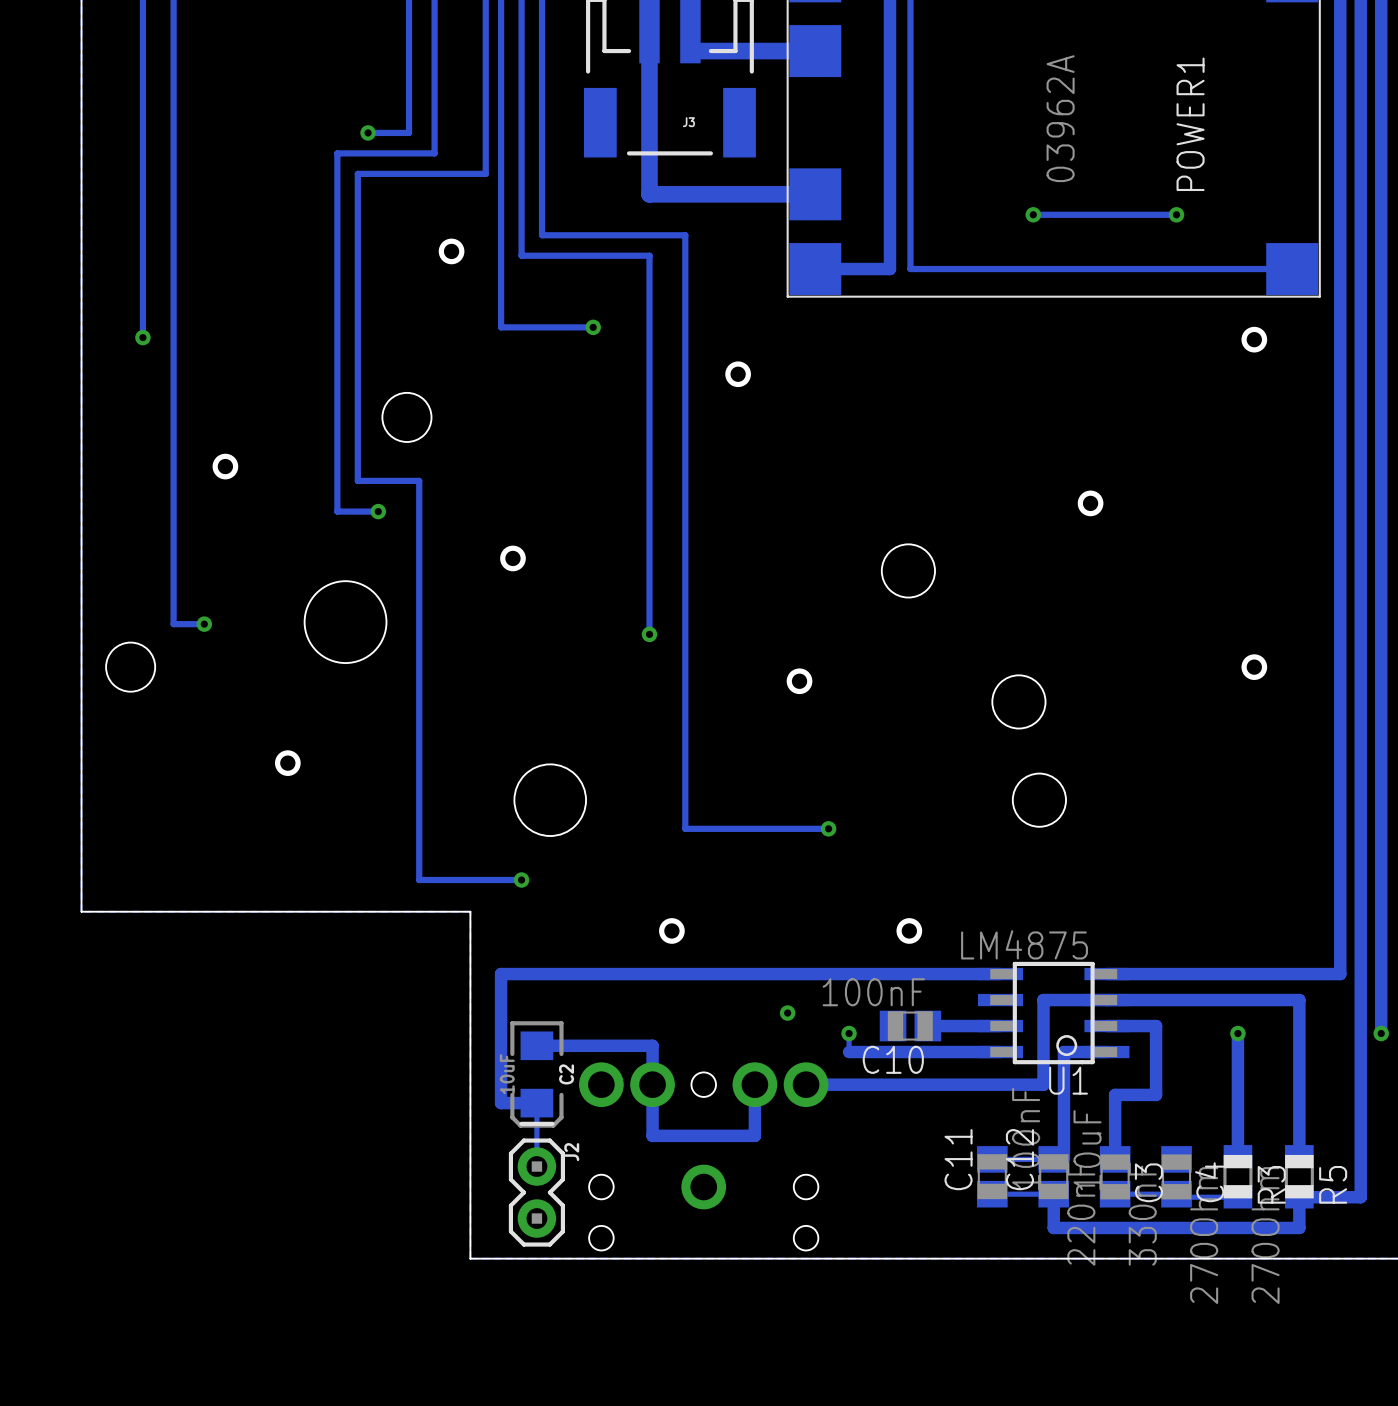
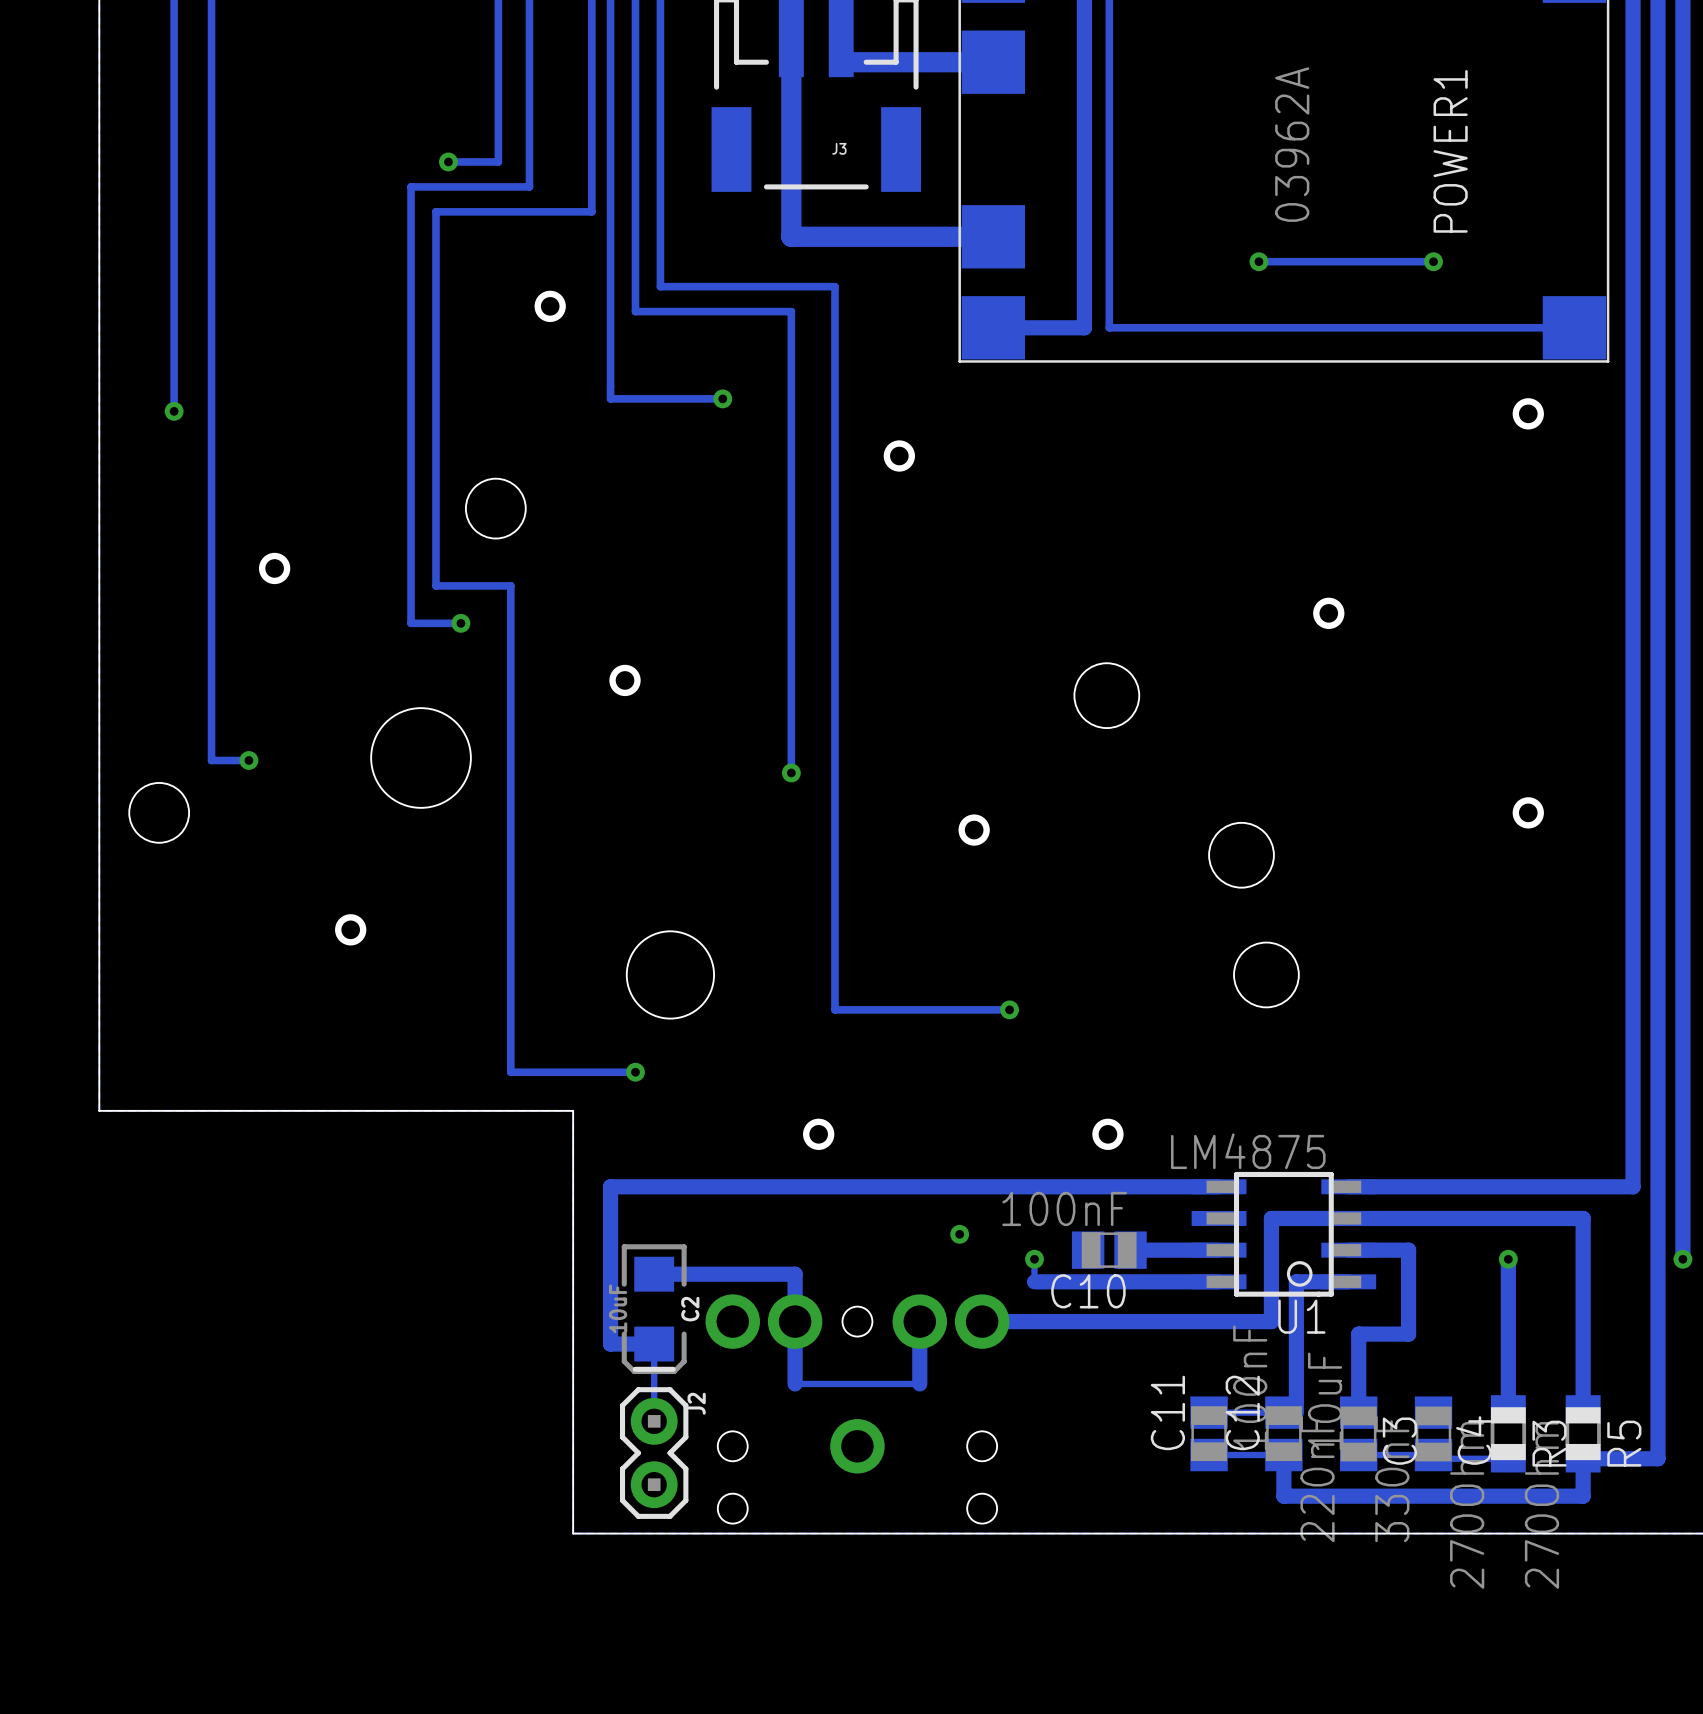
track width: thick (754, 1135) (652, 1135) -> thin (919, 1383) (795, 1383)

